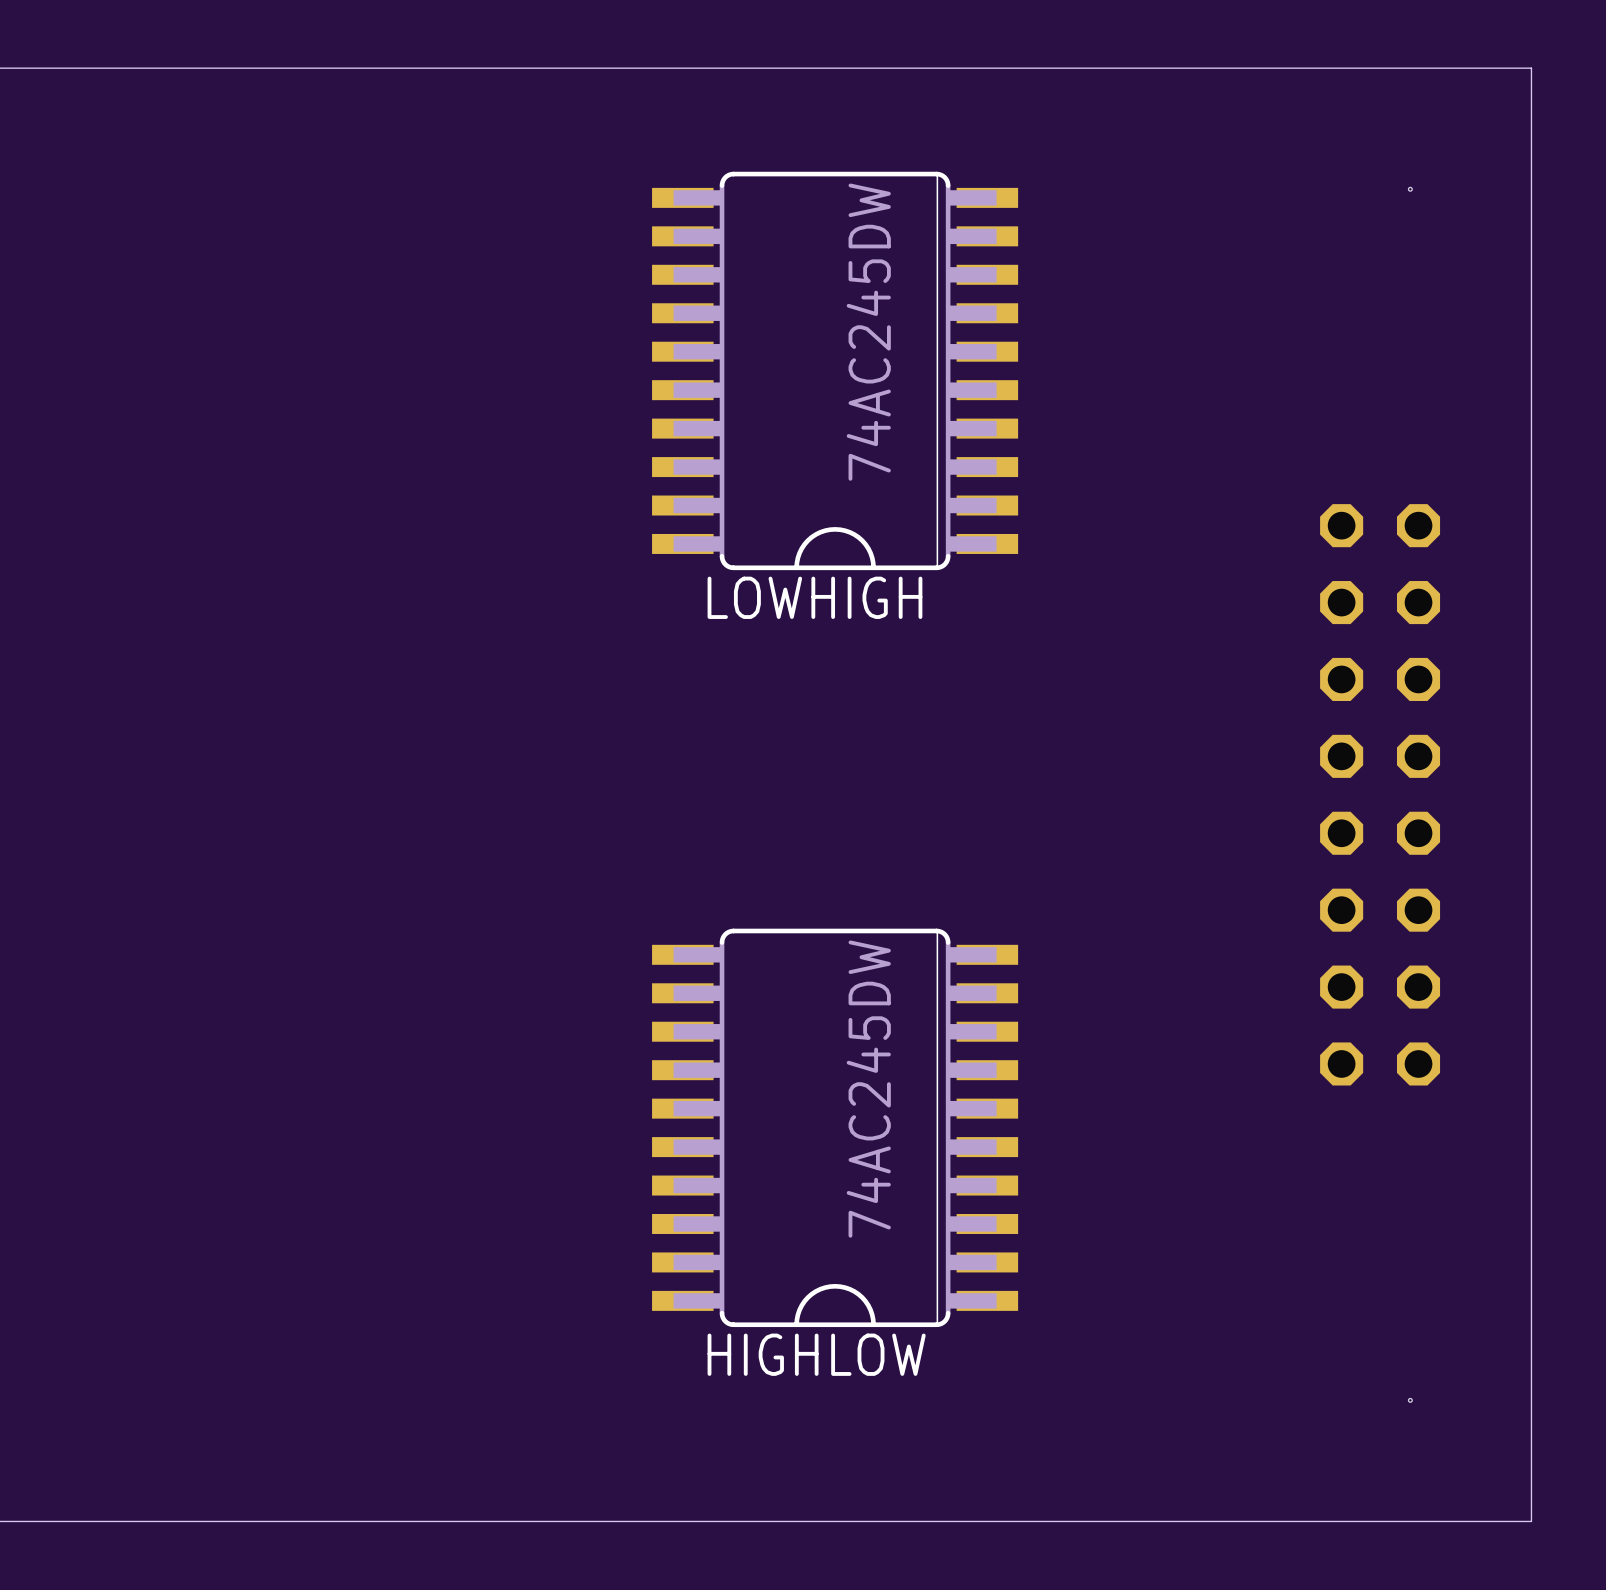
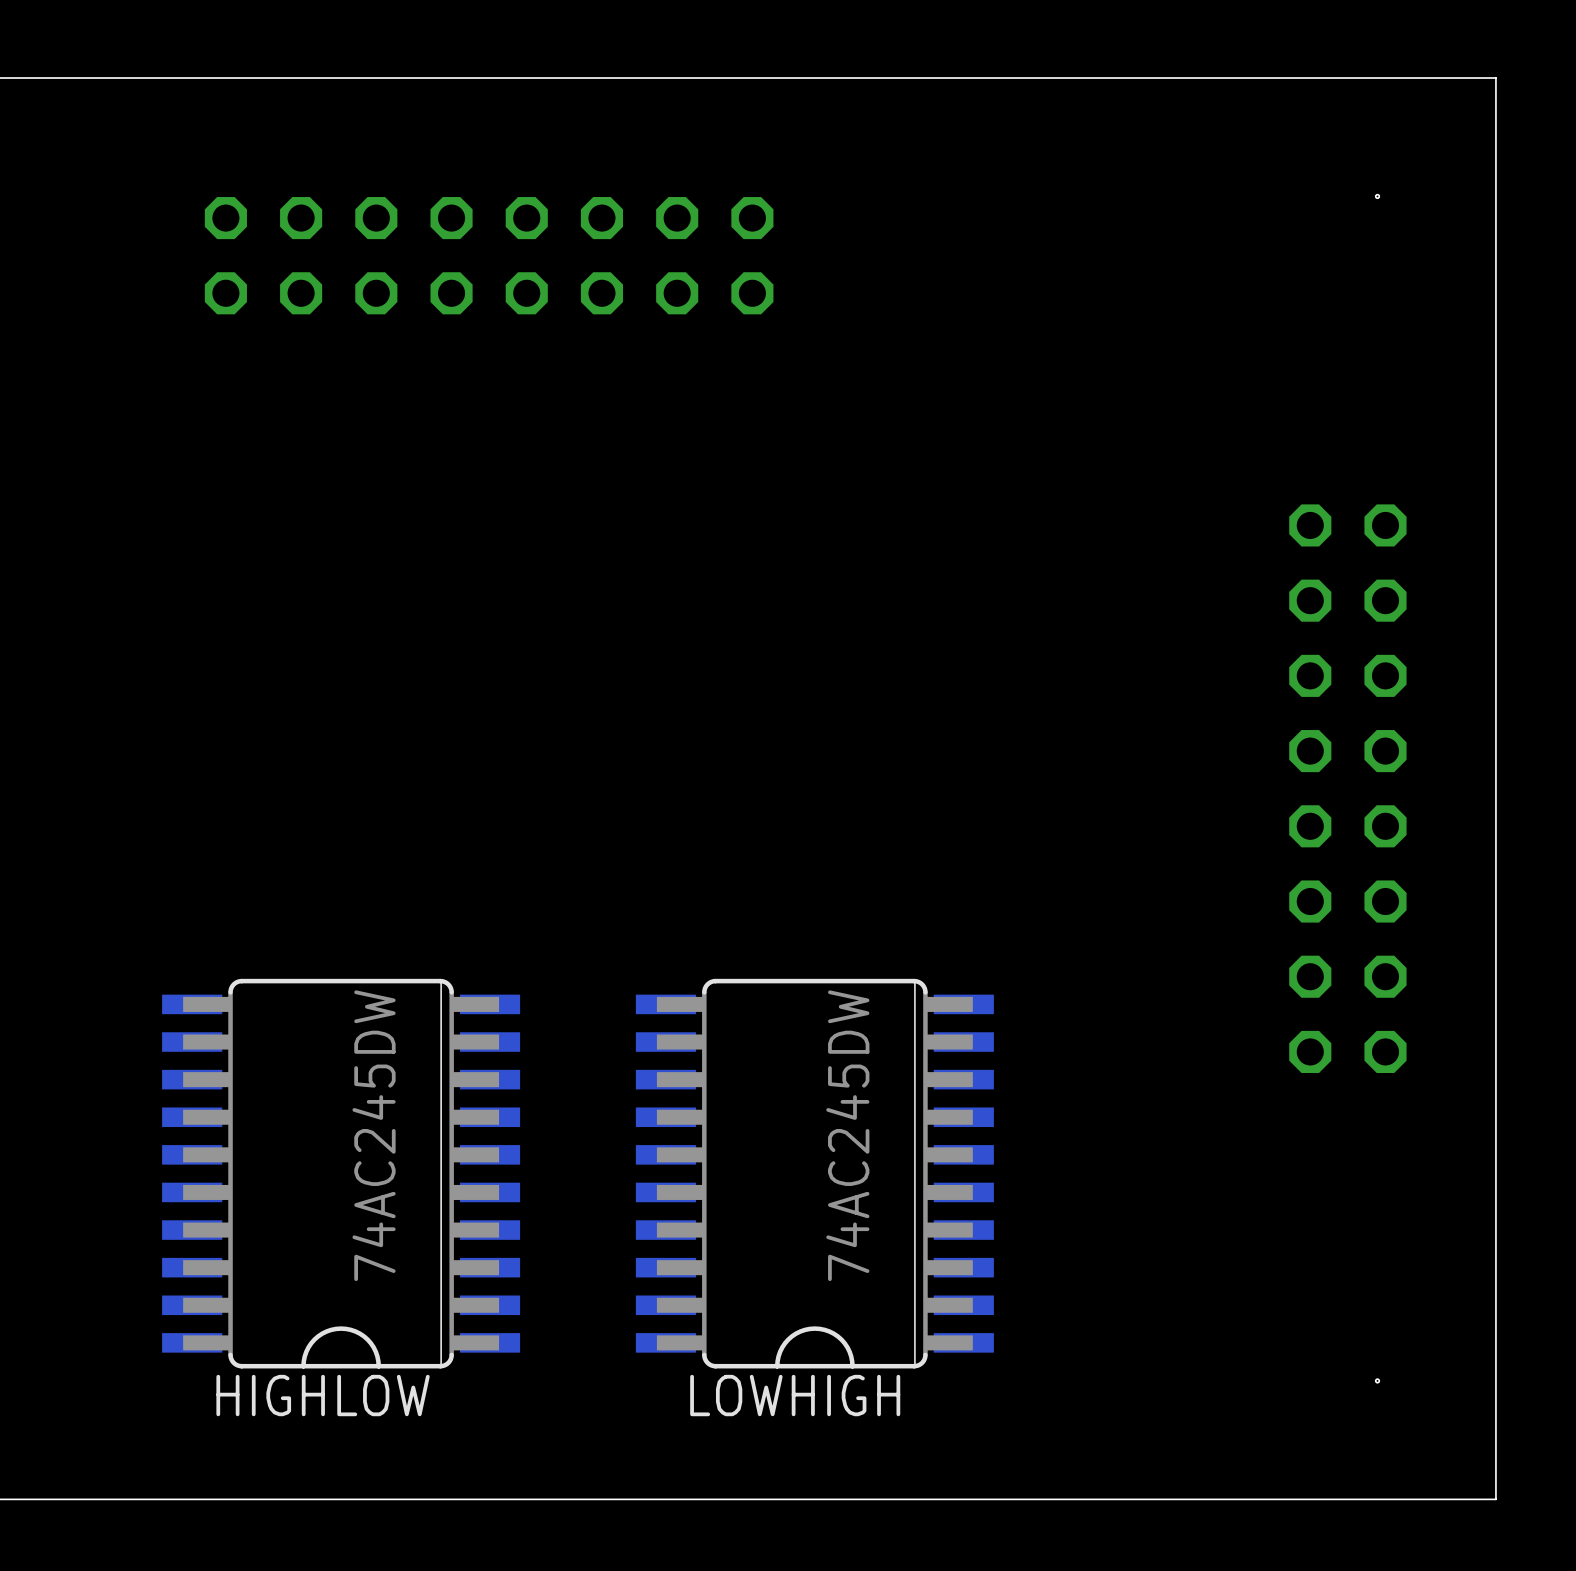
part: none -> (489, 255)
LOWHIGH: 74AC245DW (835, 370) -> none
HIGHLOW position: (835, 1127) -> (341, 1173)
LOWHIGH: none -> 74AC245DW (814, 1173)

